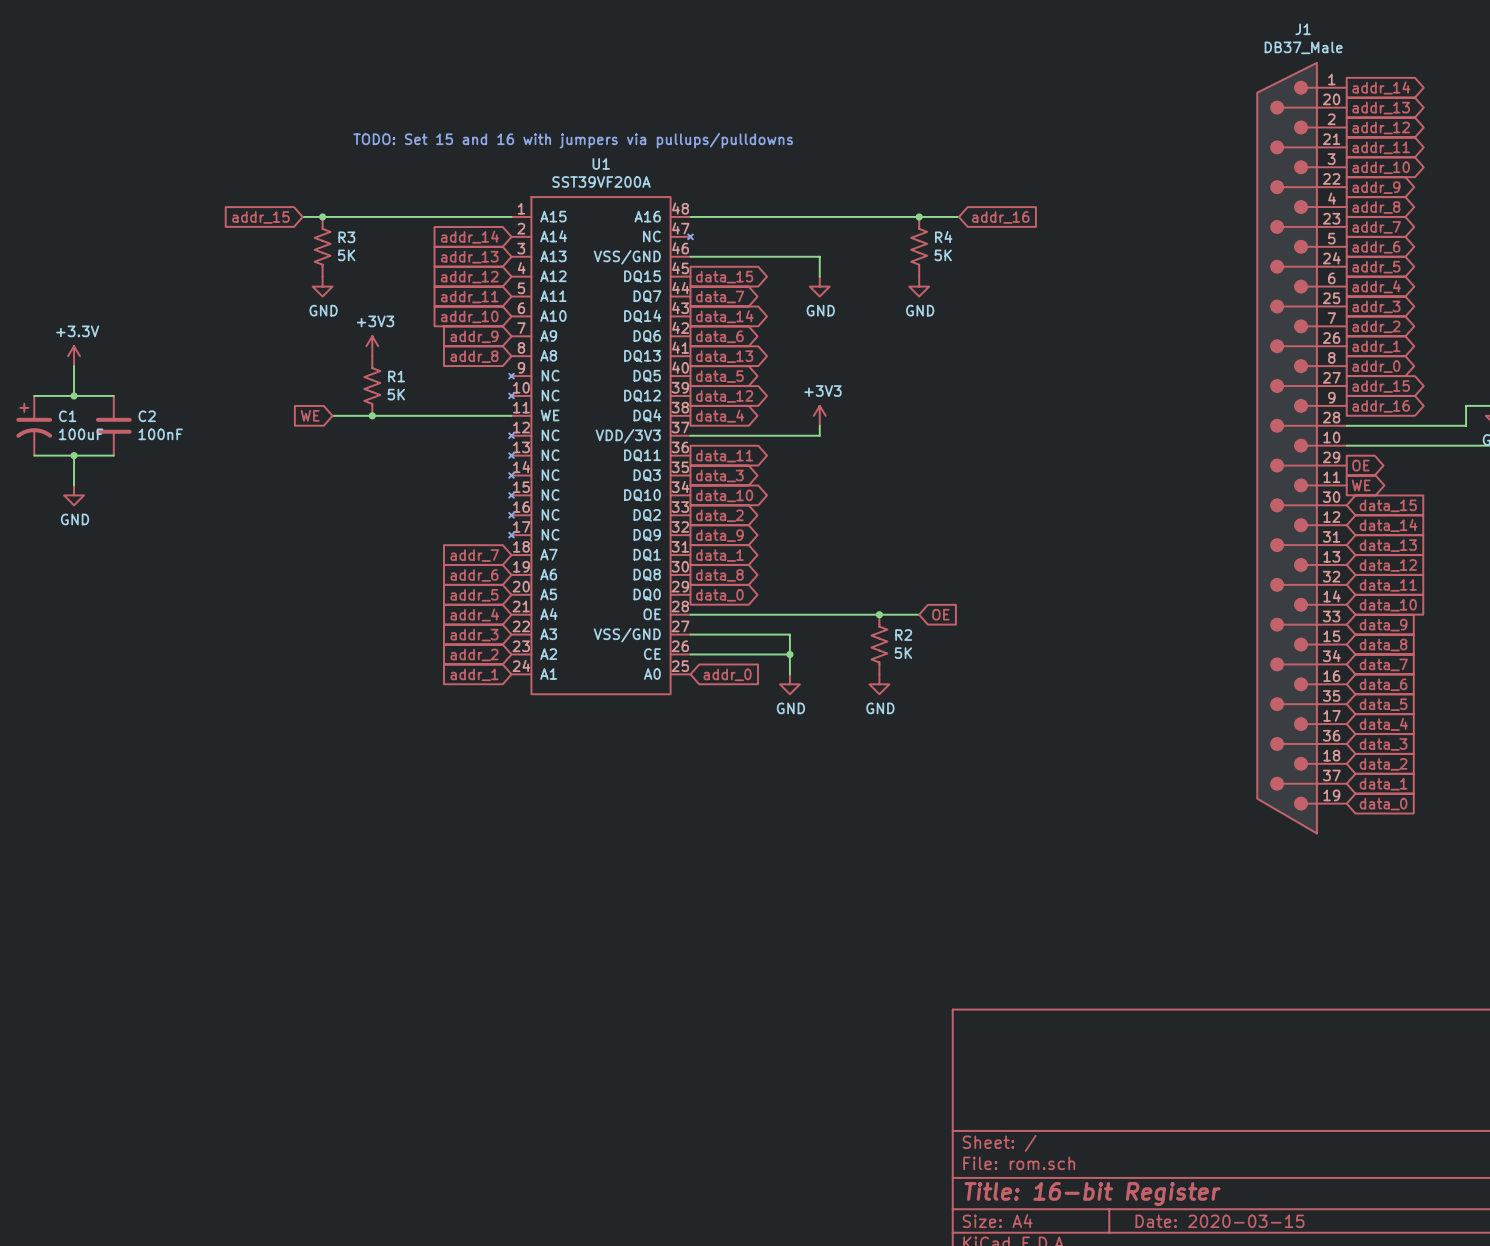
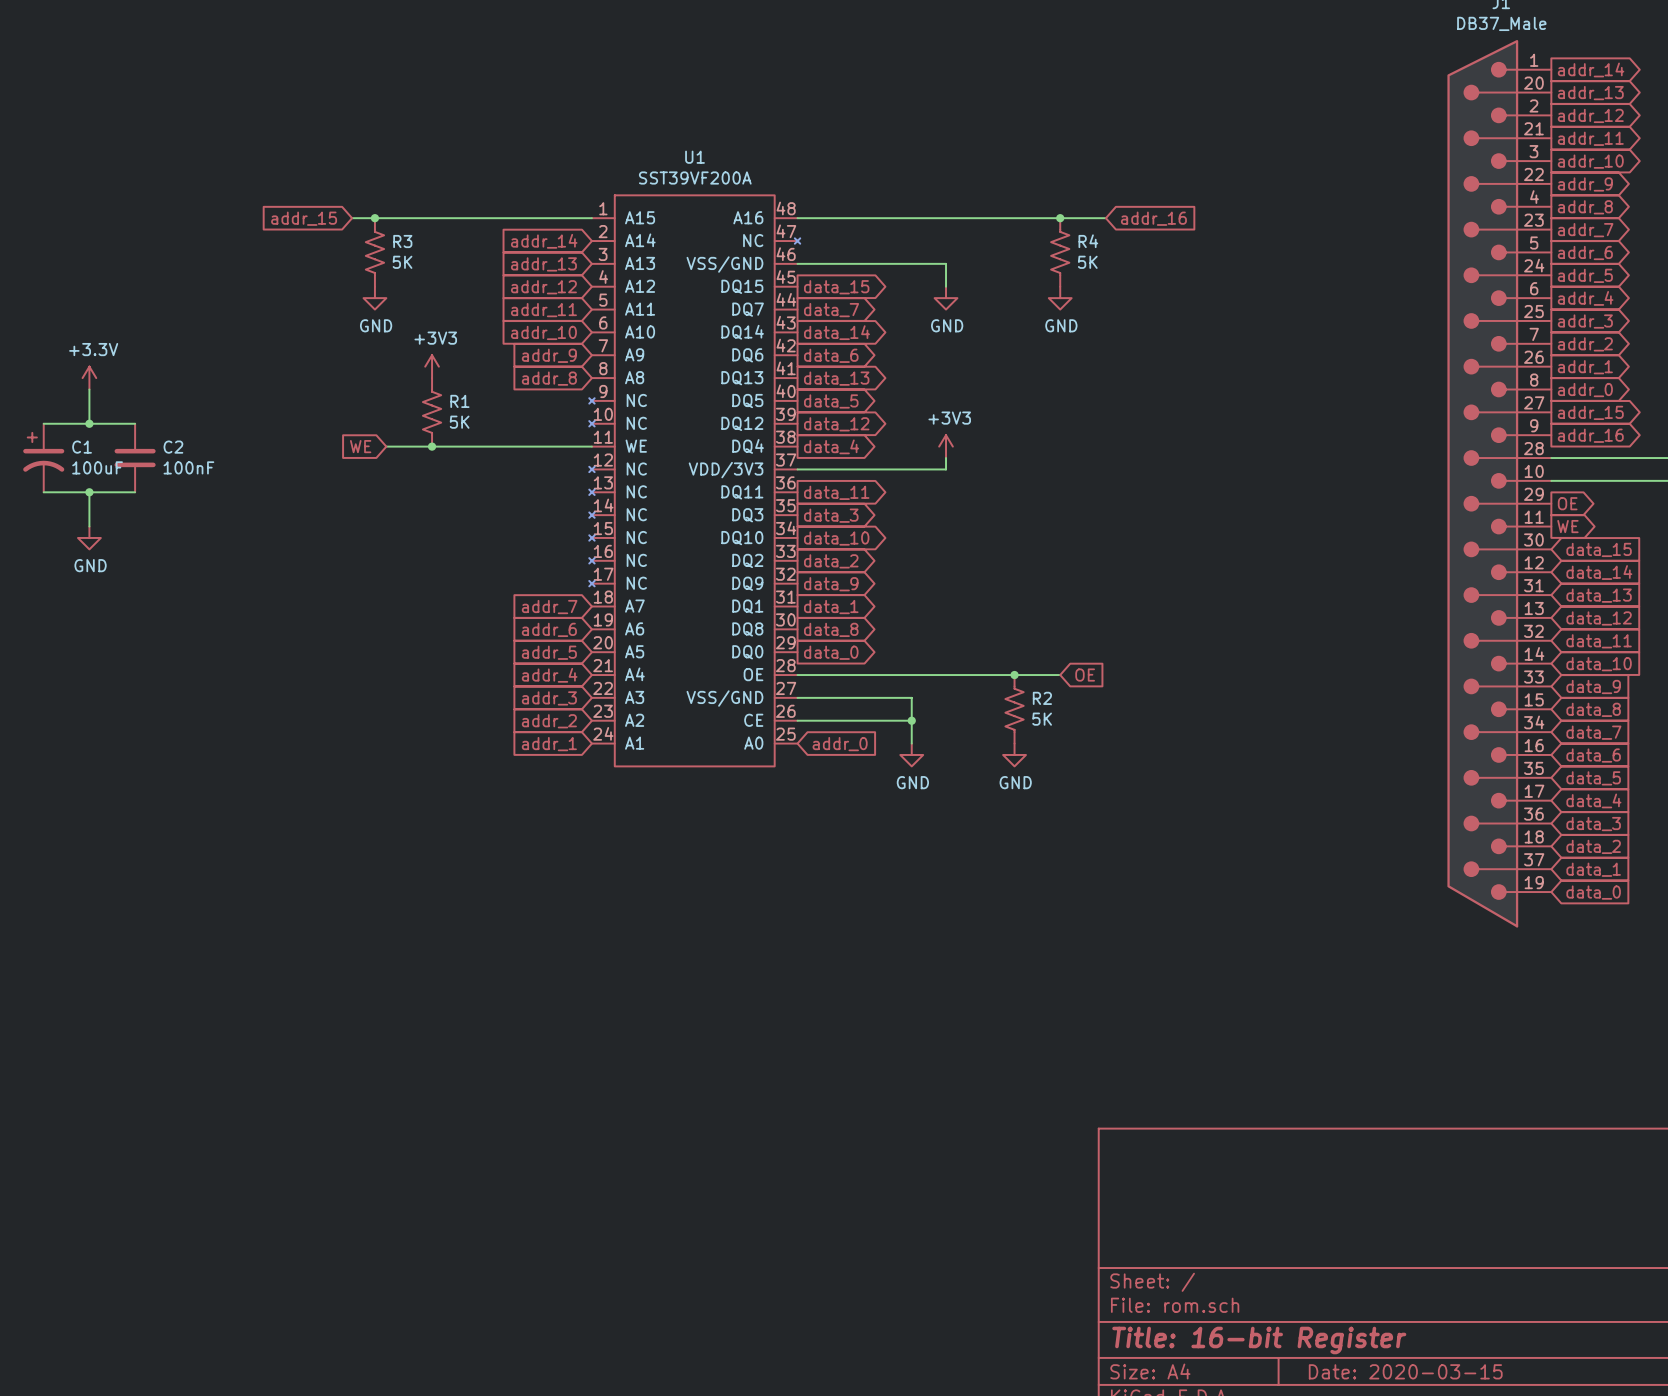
text: TODO: Set 15 and 16 with jumpers via pullups/pulldowns (573, 140) -> none

